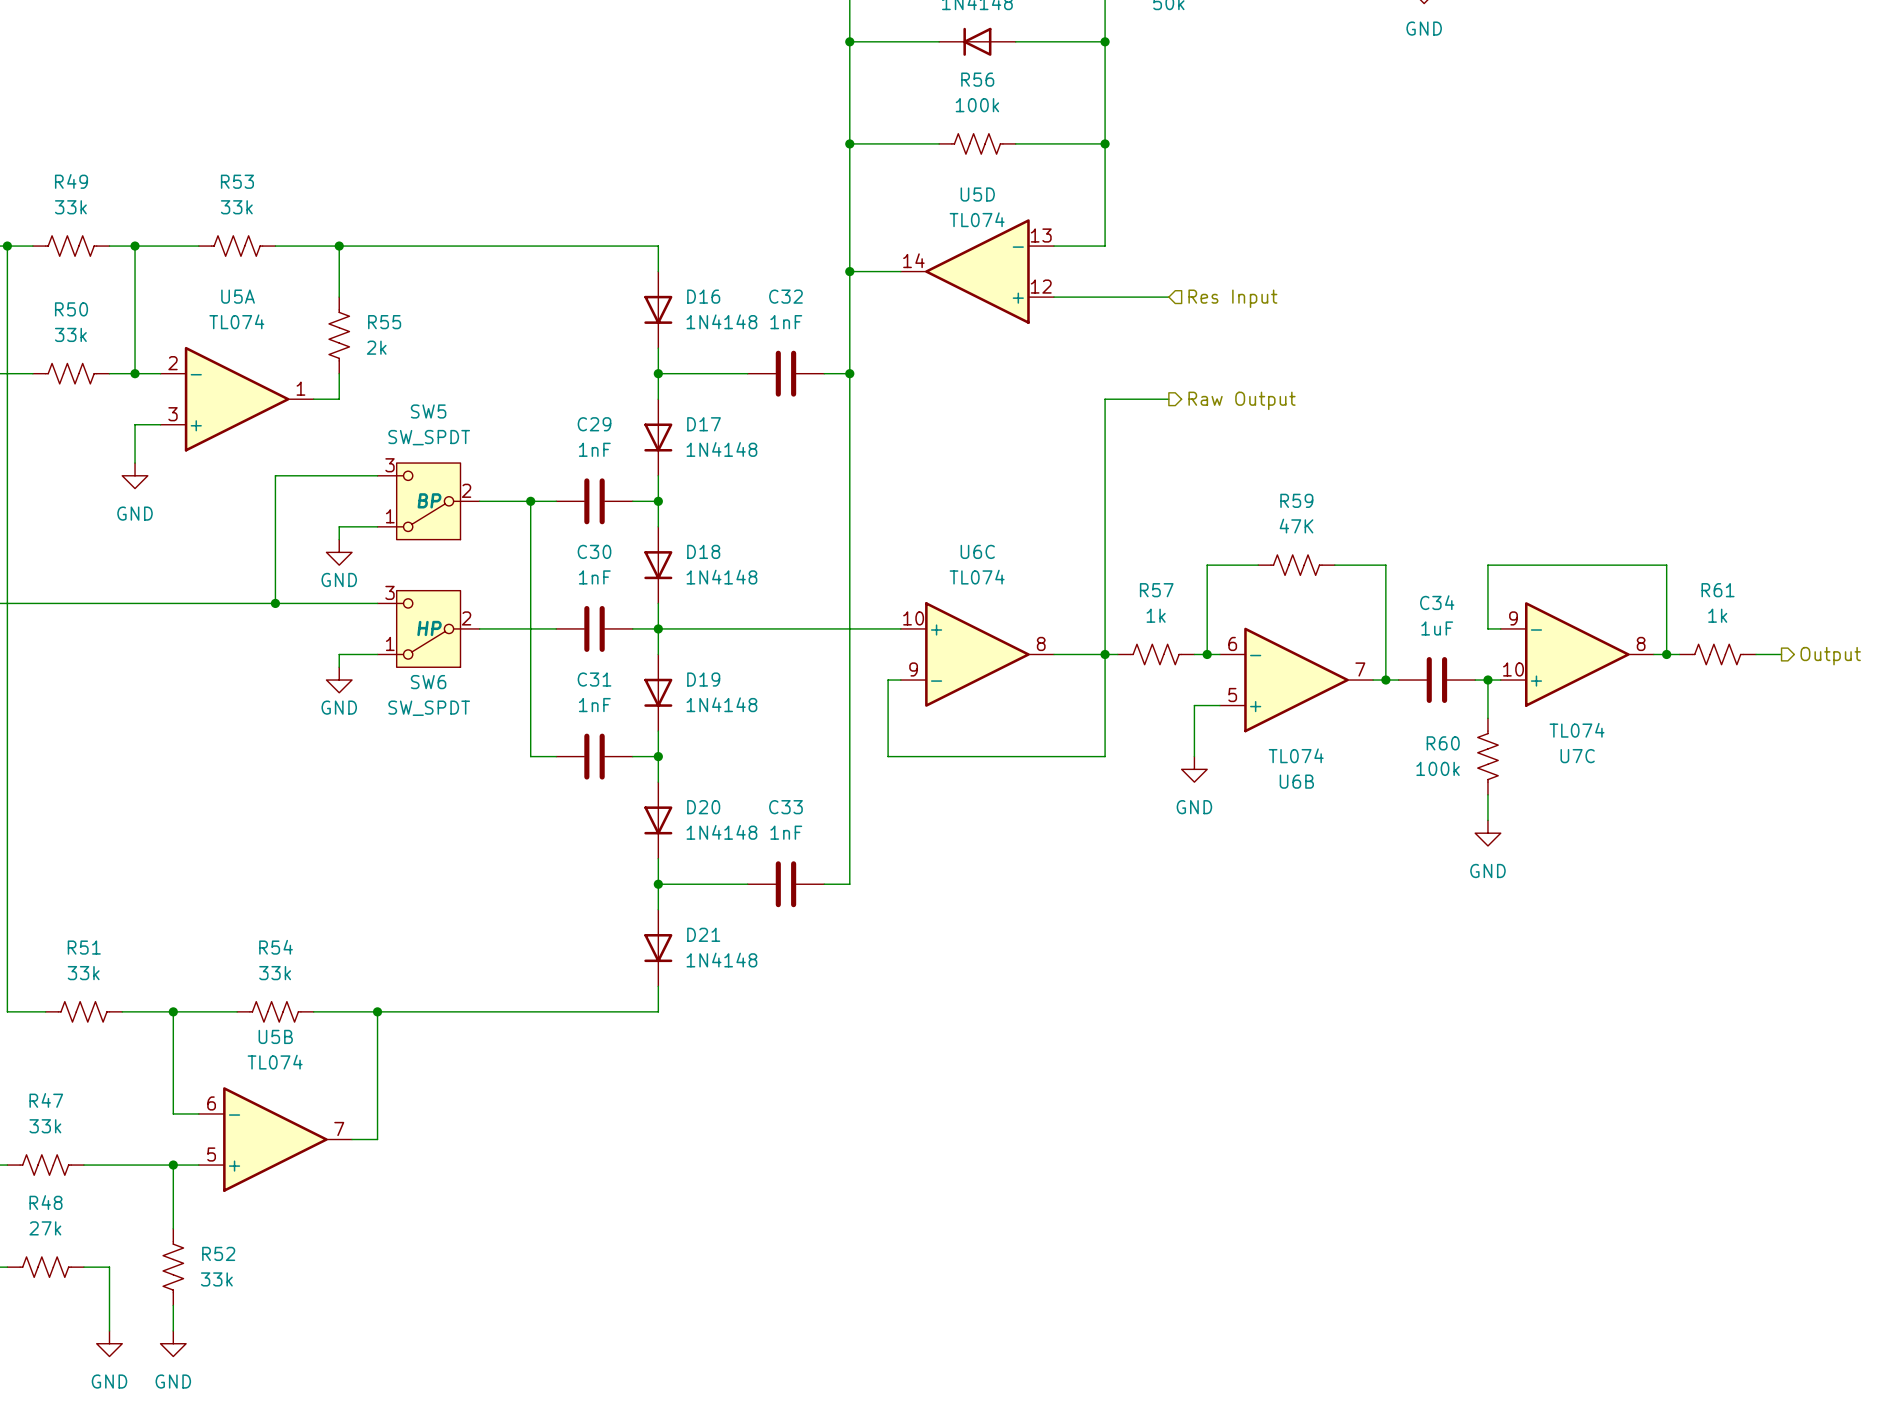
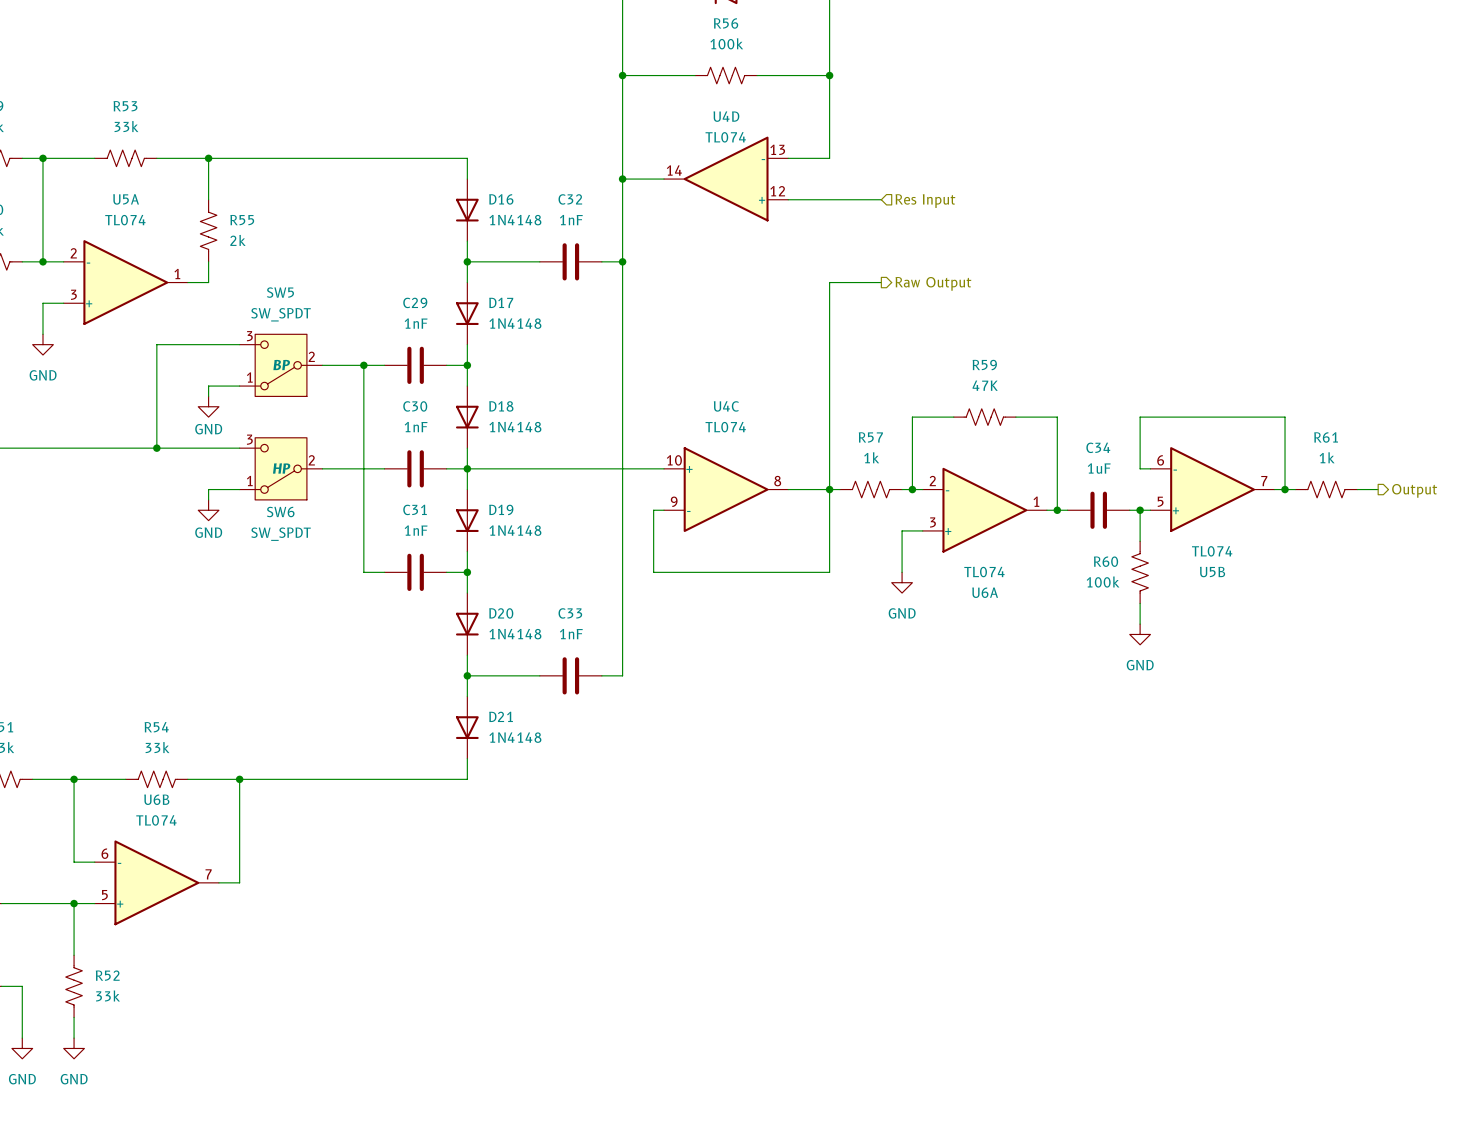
U5D name: U5D (977, 194) -> U4D (726, 116)
U6C name: U6C (977, 551) -> U4C (726, 406)
U7C pin number: 9 (1513, 618) -> 6 (1160, 460)
U6B pin number: 6 (1232, 643) -> 2 (932, 481)
U7C pin number: 8 (1641, 643) -> 7 (1264, 481)
U6B pin number: 7 (1360, 669) -> 1 (1036, 501)
U7C pin number: 10 (1513, 669) -> 5 (1160, 501)
U6B pin number: 5 (1232, 695) -> 3 (932, 522)
U7C name: U7C (1577, 756) -> U5B (1212, 572)
U6B name: U6B (1296, 781) -> U6A (985, 592)
U5B name: U5B (275, 1036) -> U6B (156, 799)

